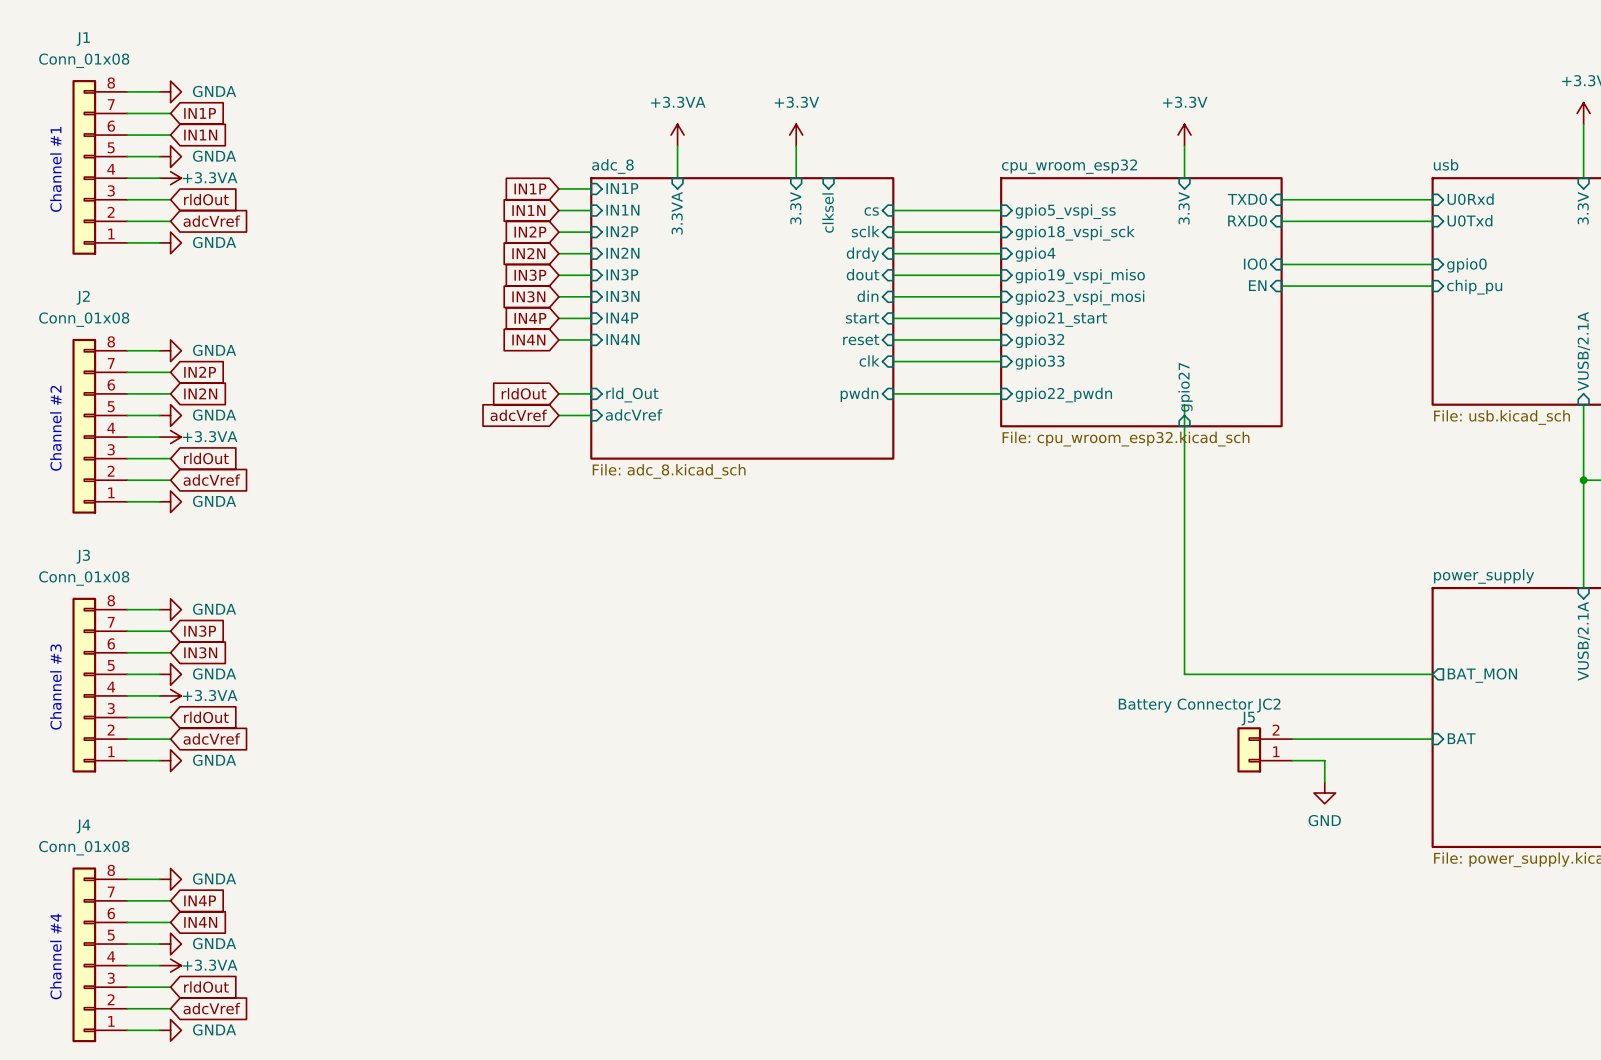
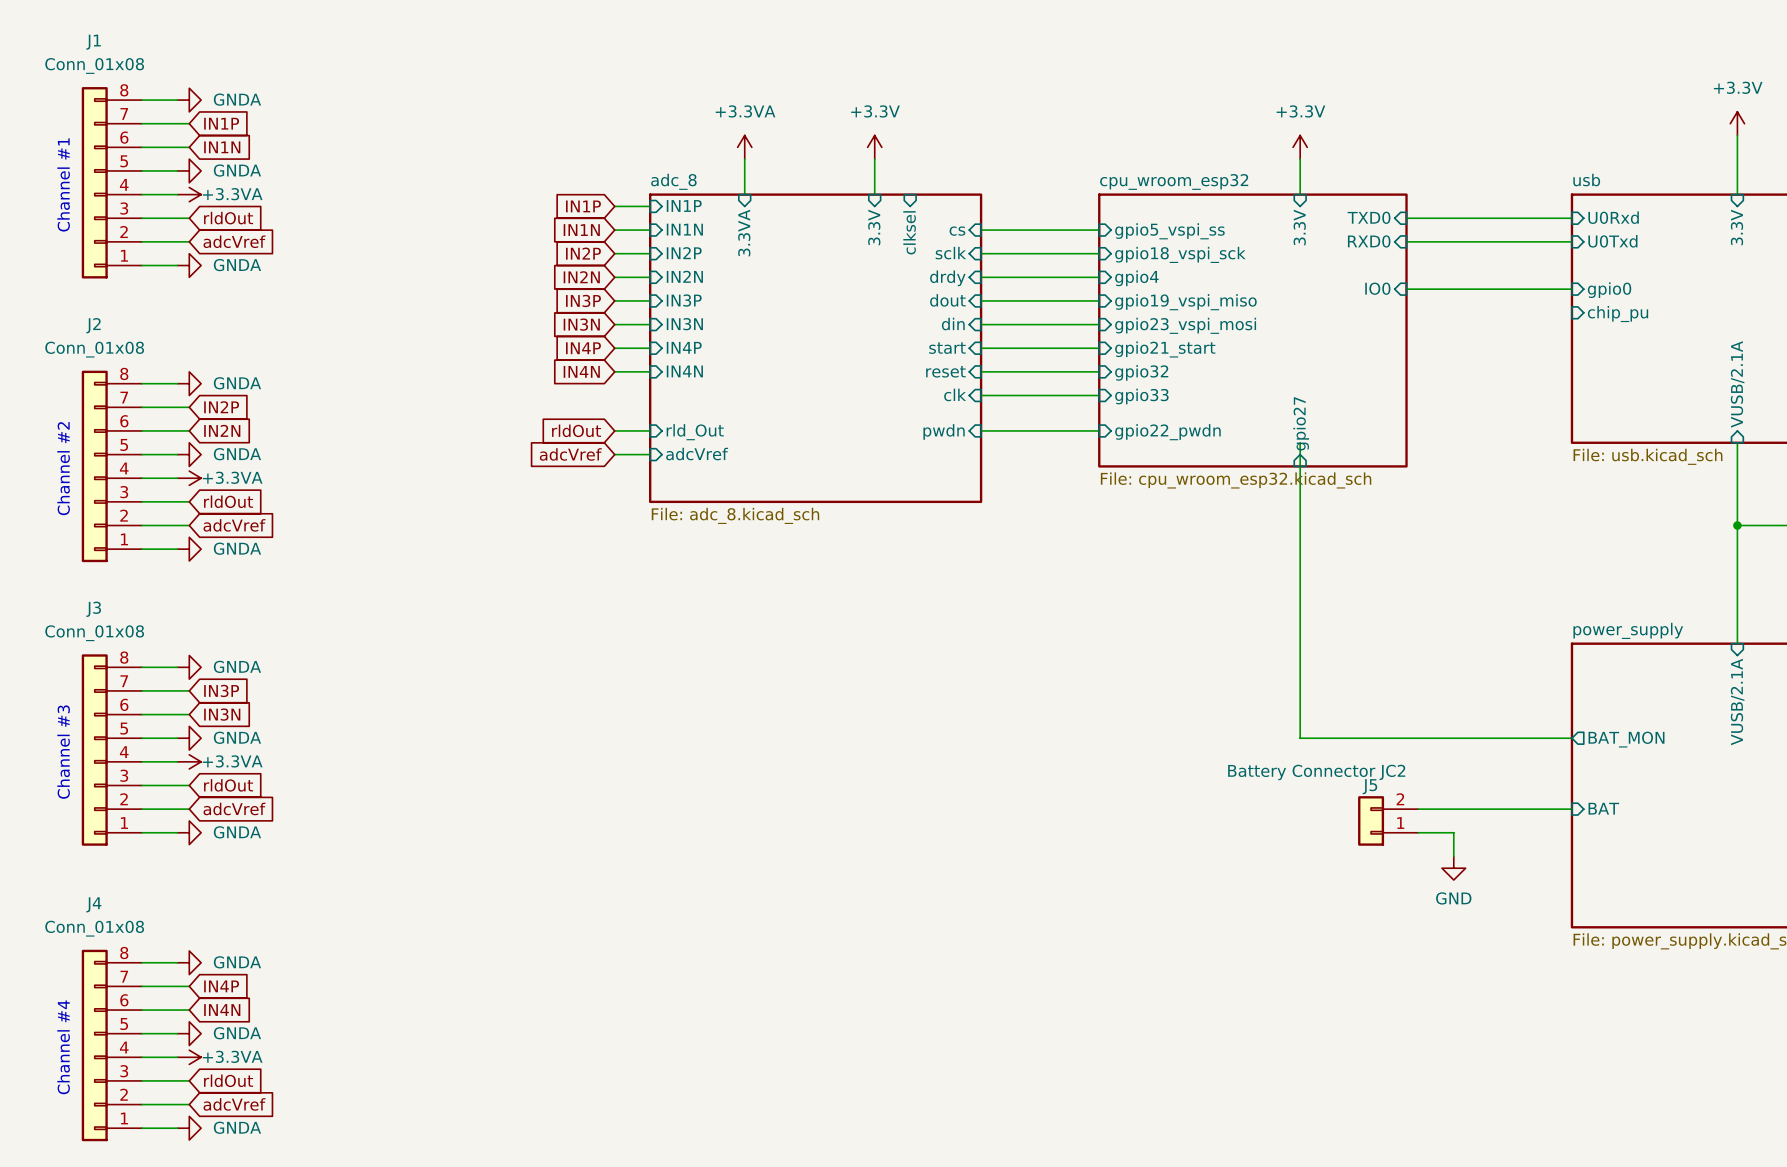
sheet pin: EN (1257, 285) -> none
wire: (1281, 286) (1432, 286) -> none

